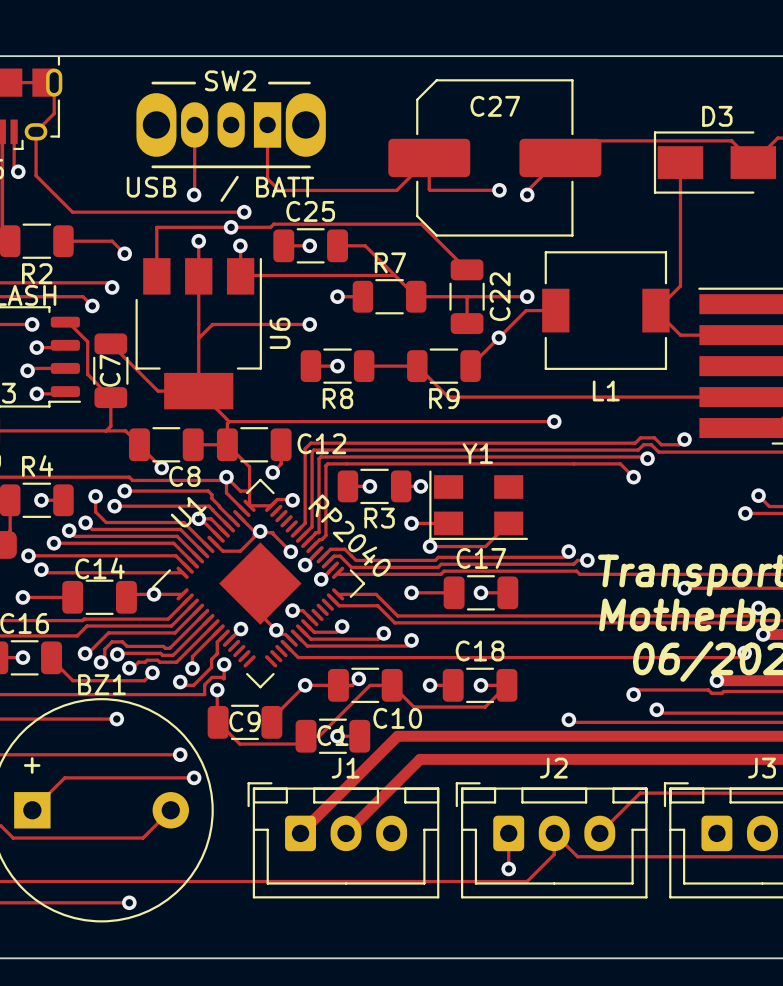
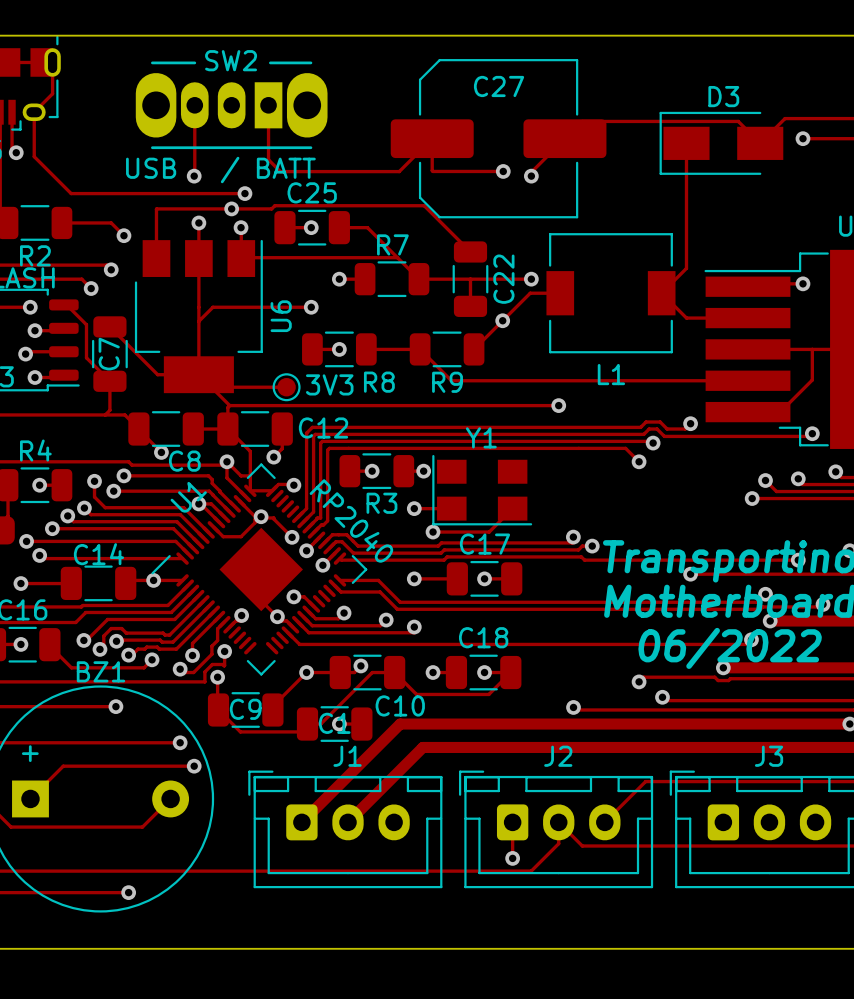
R8 name position: R8 (337, 398) -> R8 (379, 382)
track: none -> (211, 387) (286, 387)
3V3: none -> (286, 387)

